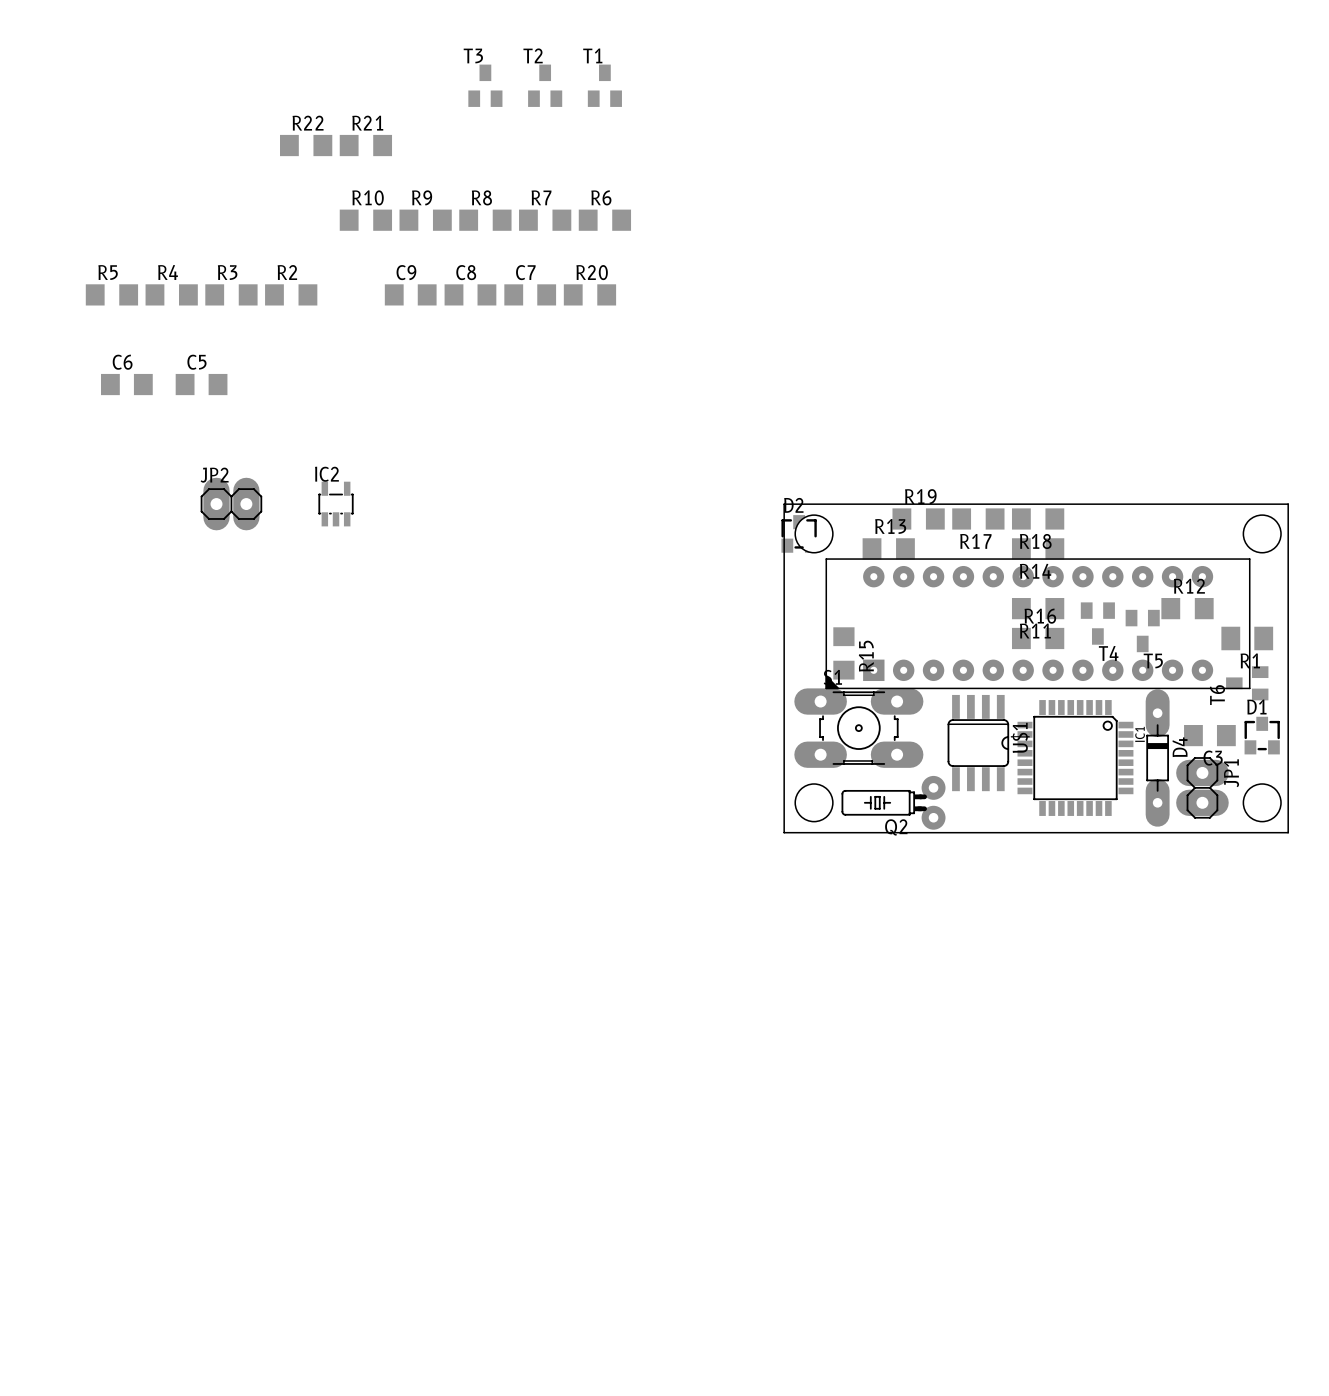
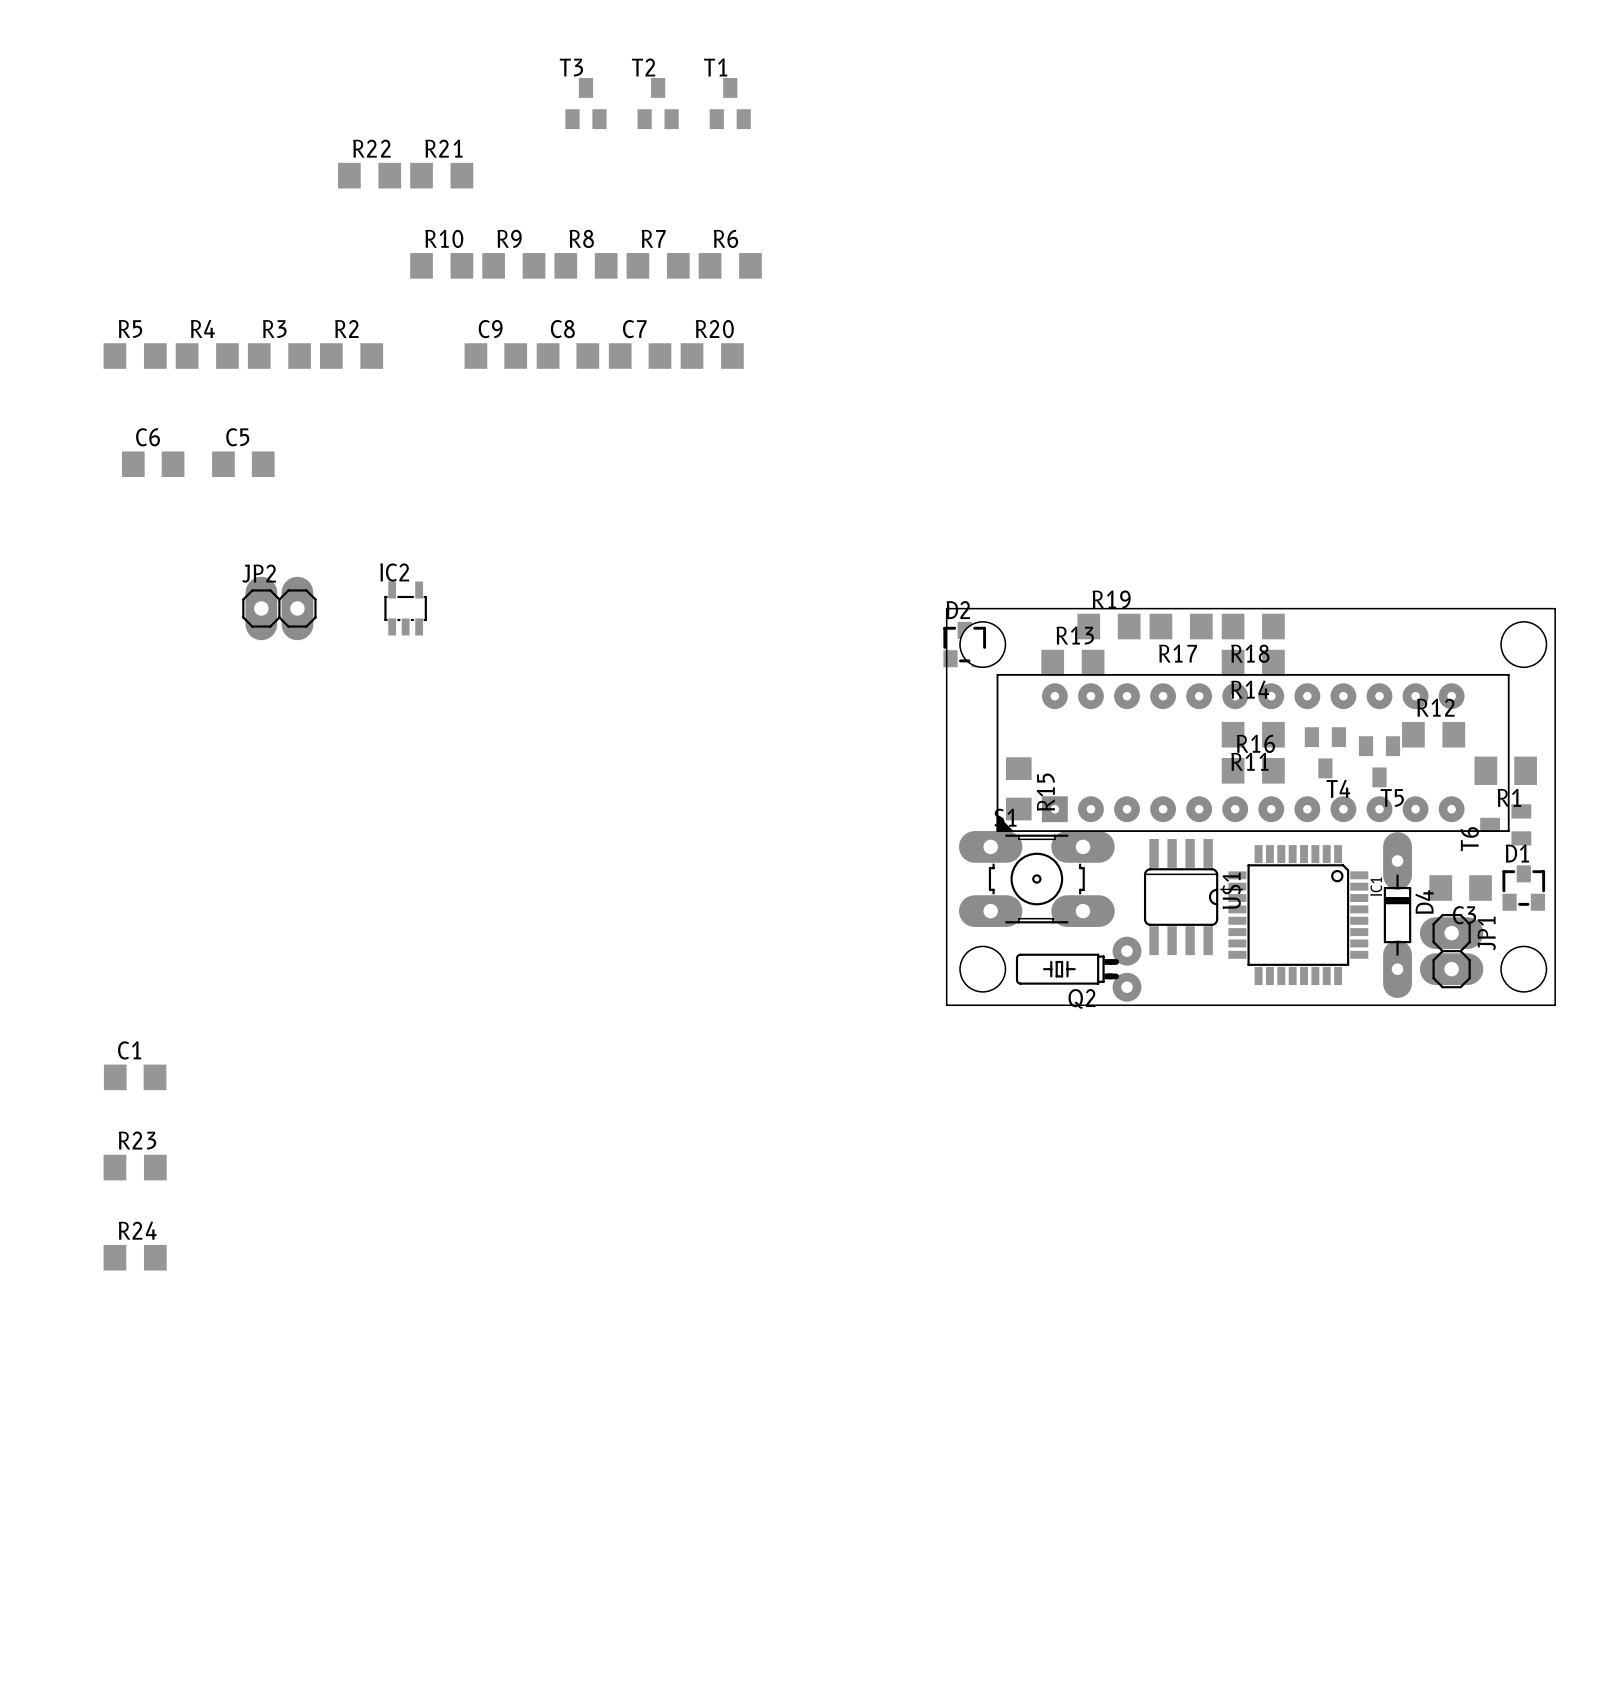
C1: none -> (135, 1077)
R23: none -> (135, 1167)
R24: none -> (135, 1257)

